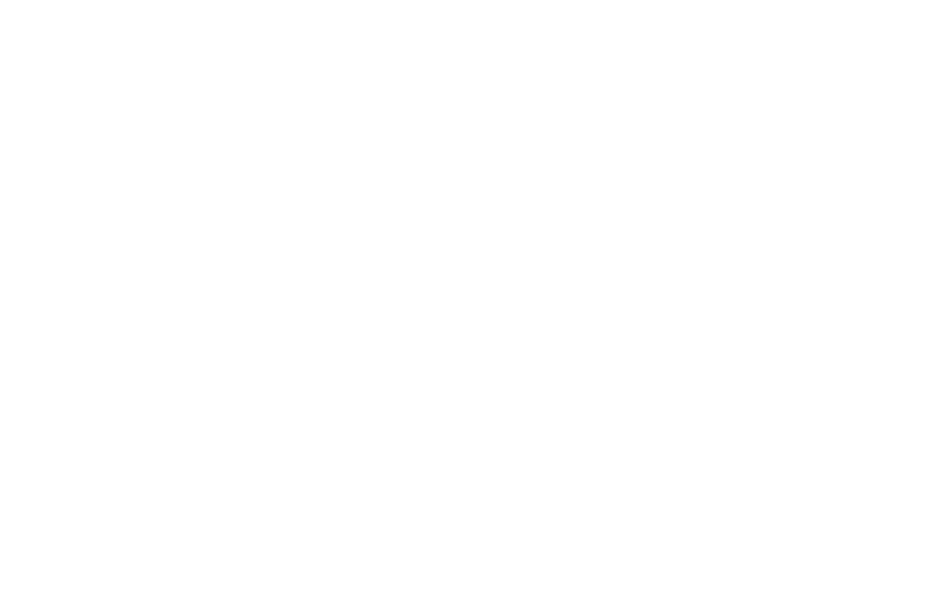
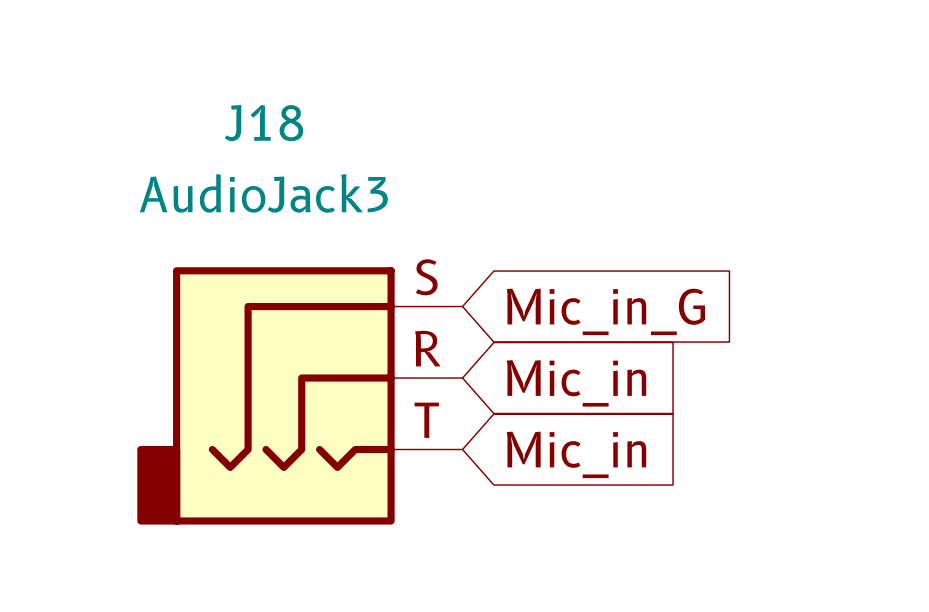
global label: none -> Mic_in_G (605, 311)
global label: none -> Mic_in (576, 383)
J18: none -> AudioJack3 (299, 395)
global label: none -> Mic_in (576, 454)

